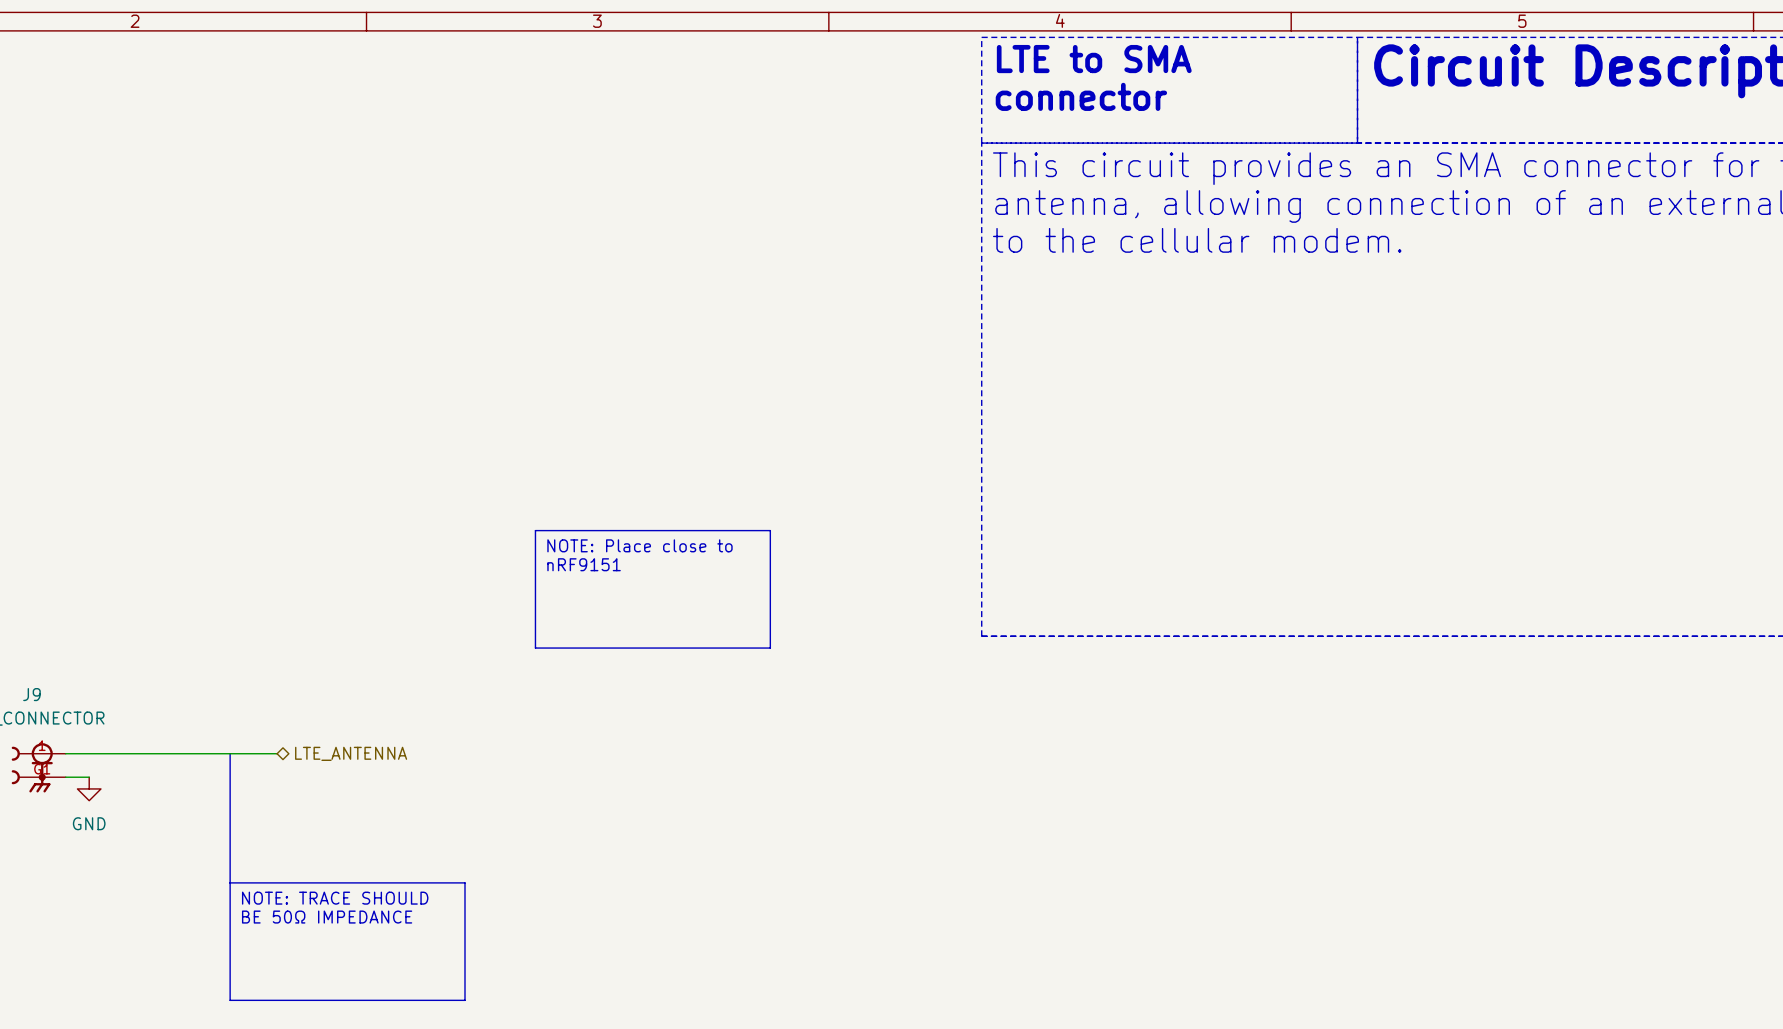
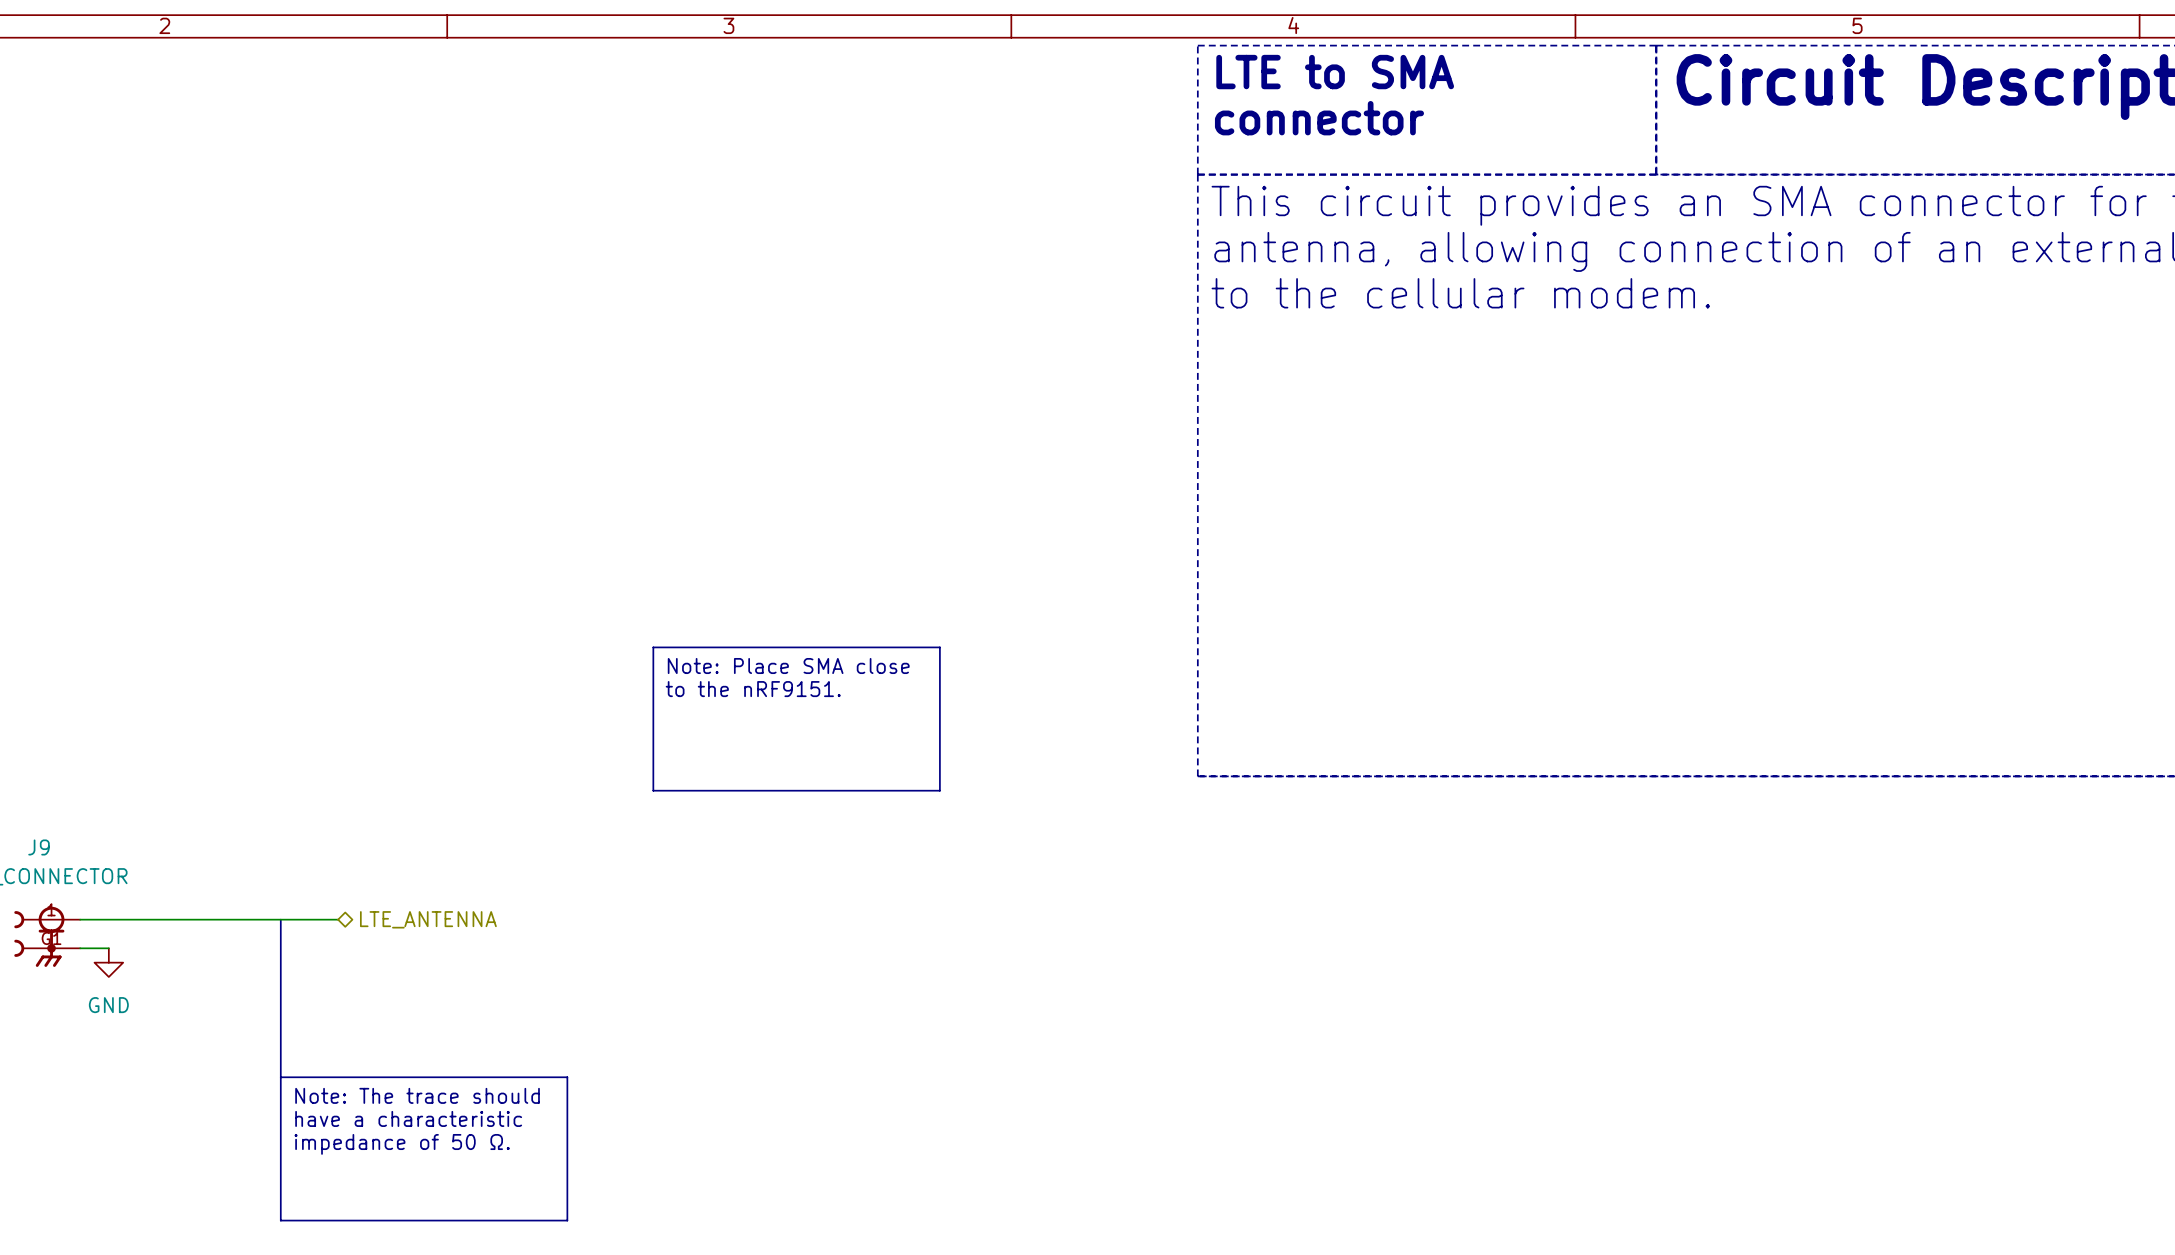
text: NOTE: Place close to (639, 545) -> Note: Place SMA close (788, 666)
text: nRF9151 (584, 564) -> to the nRF9151. (753, 689)
text: NOTE: TRACE SHOULD (335, 898) -> Note: The trace should (417, 1095)
text: BE 50Ω IMPEDANCE (327, 917) -> have a characteristic (408, 1118)
text: none -> impedance of 50 Ω. (402, 1144)

